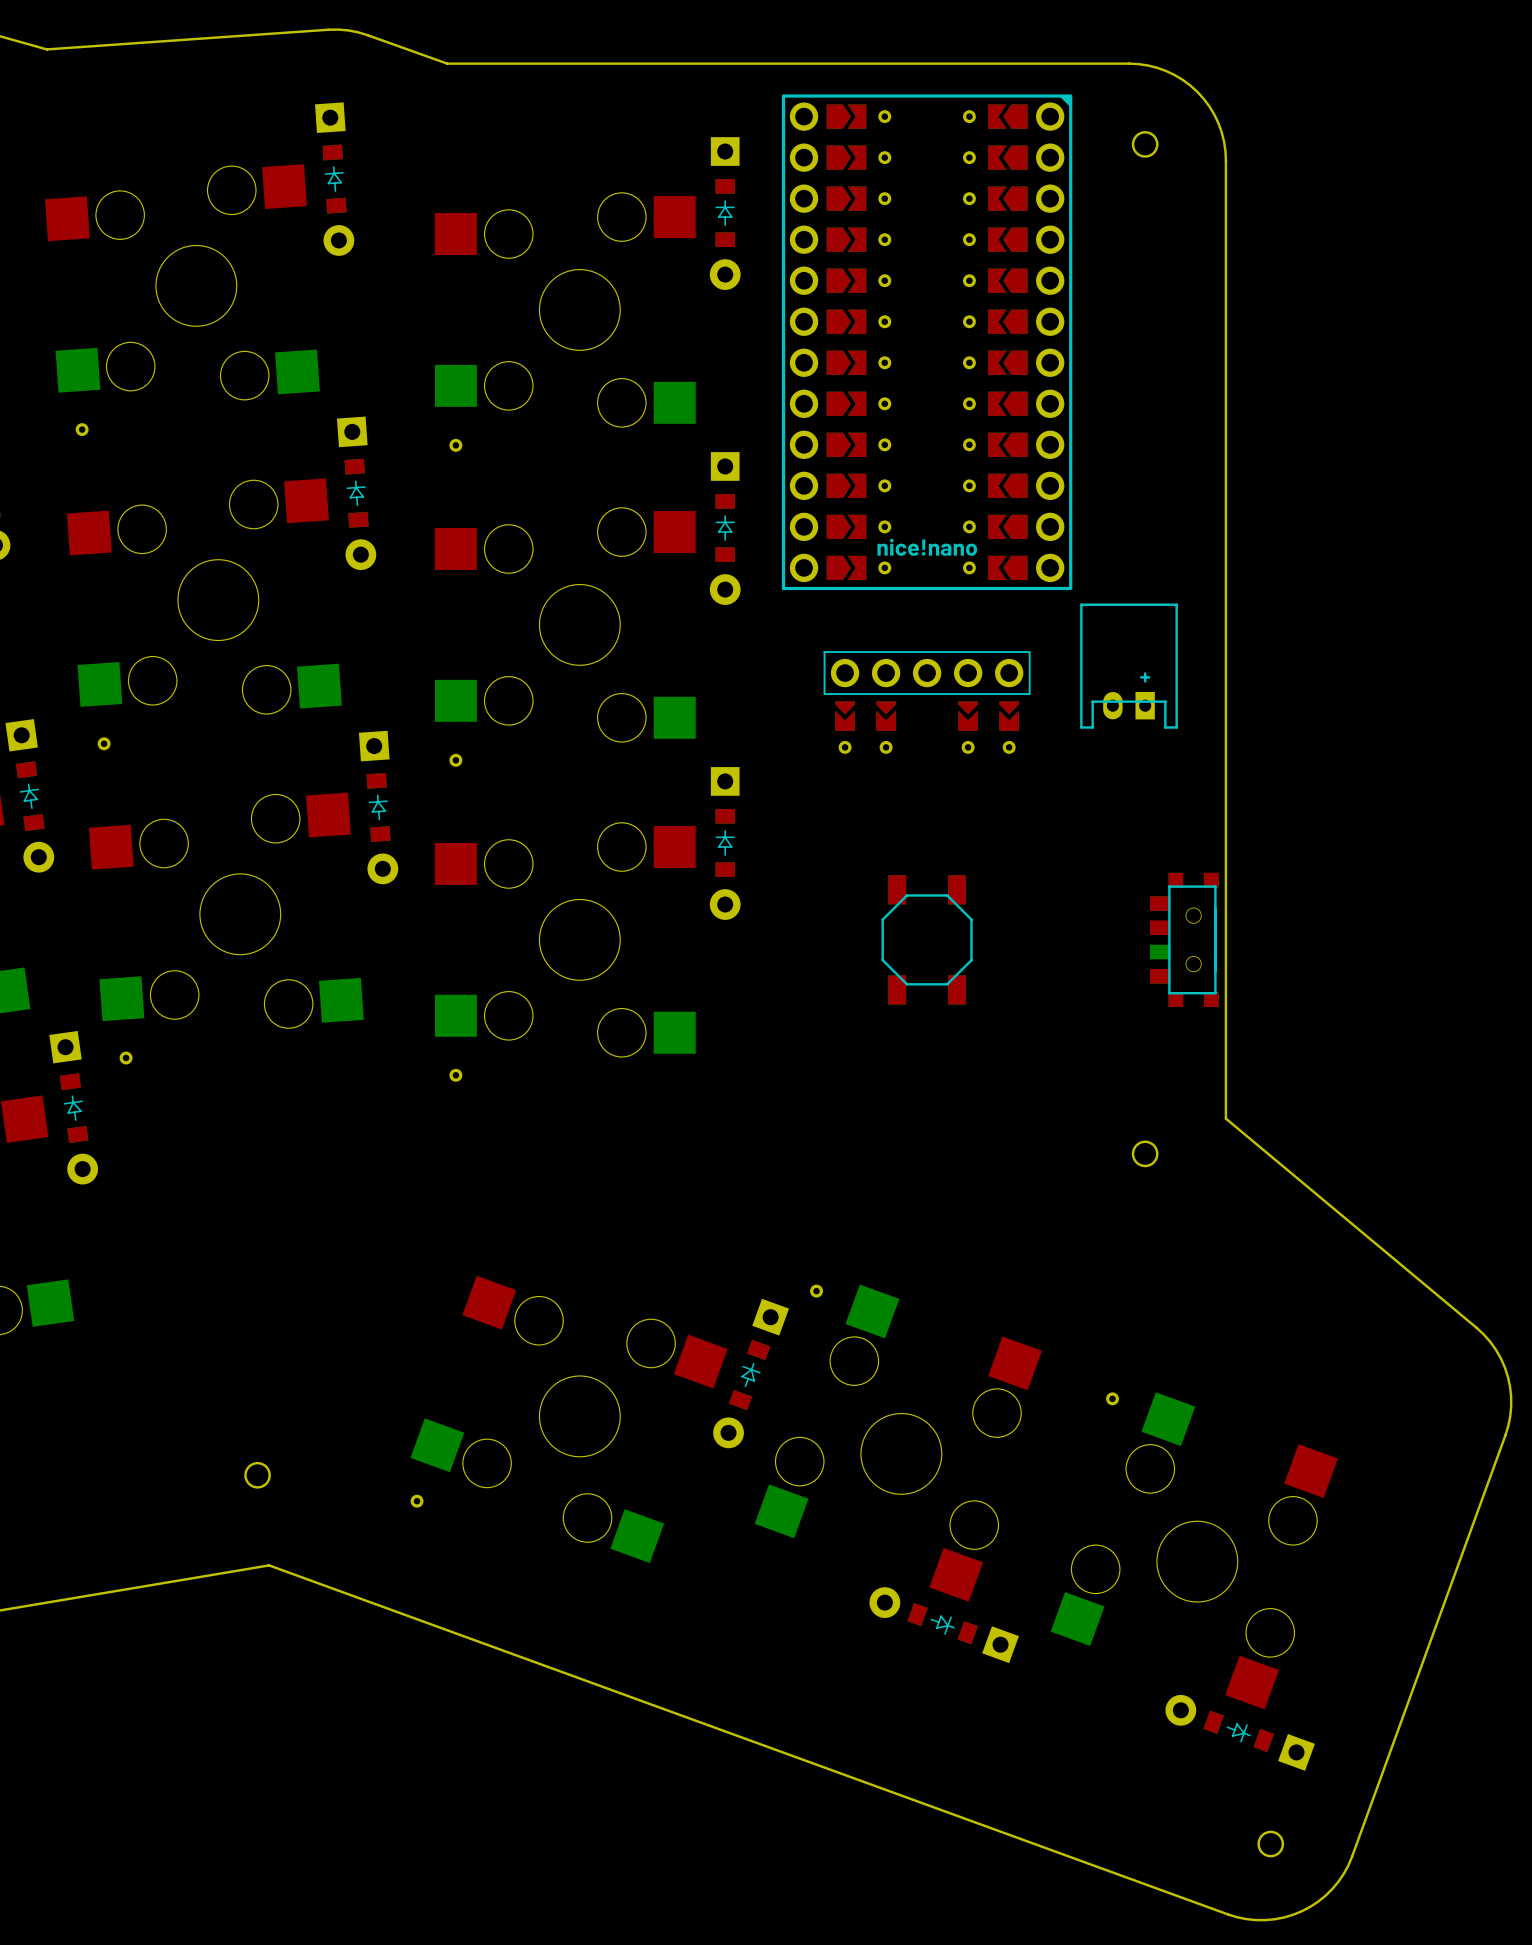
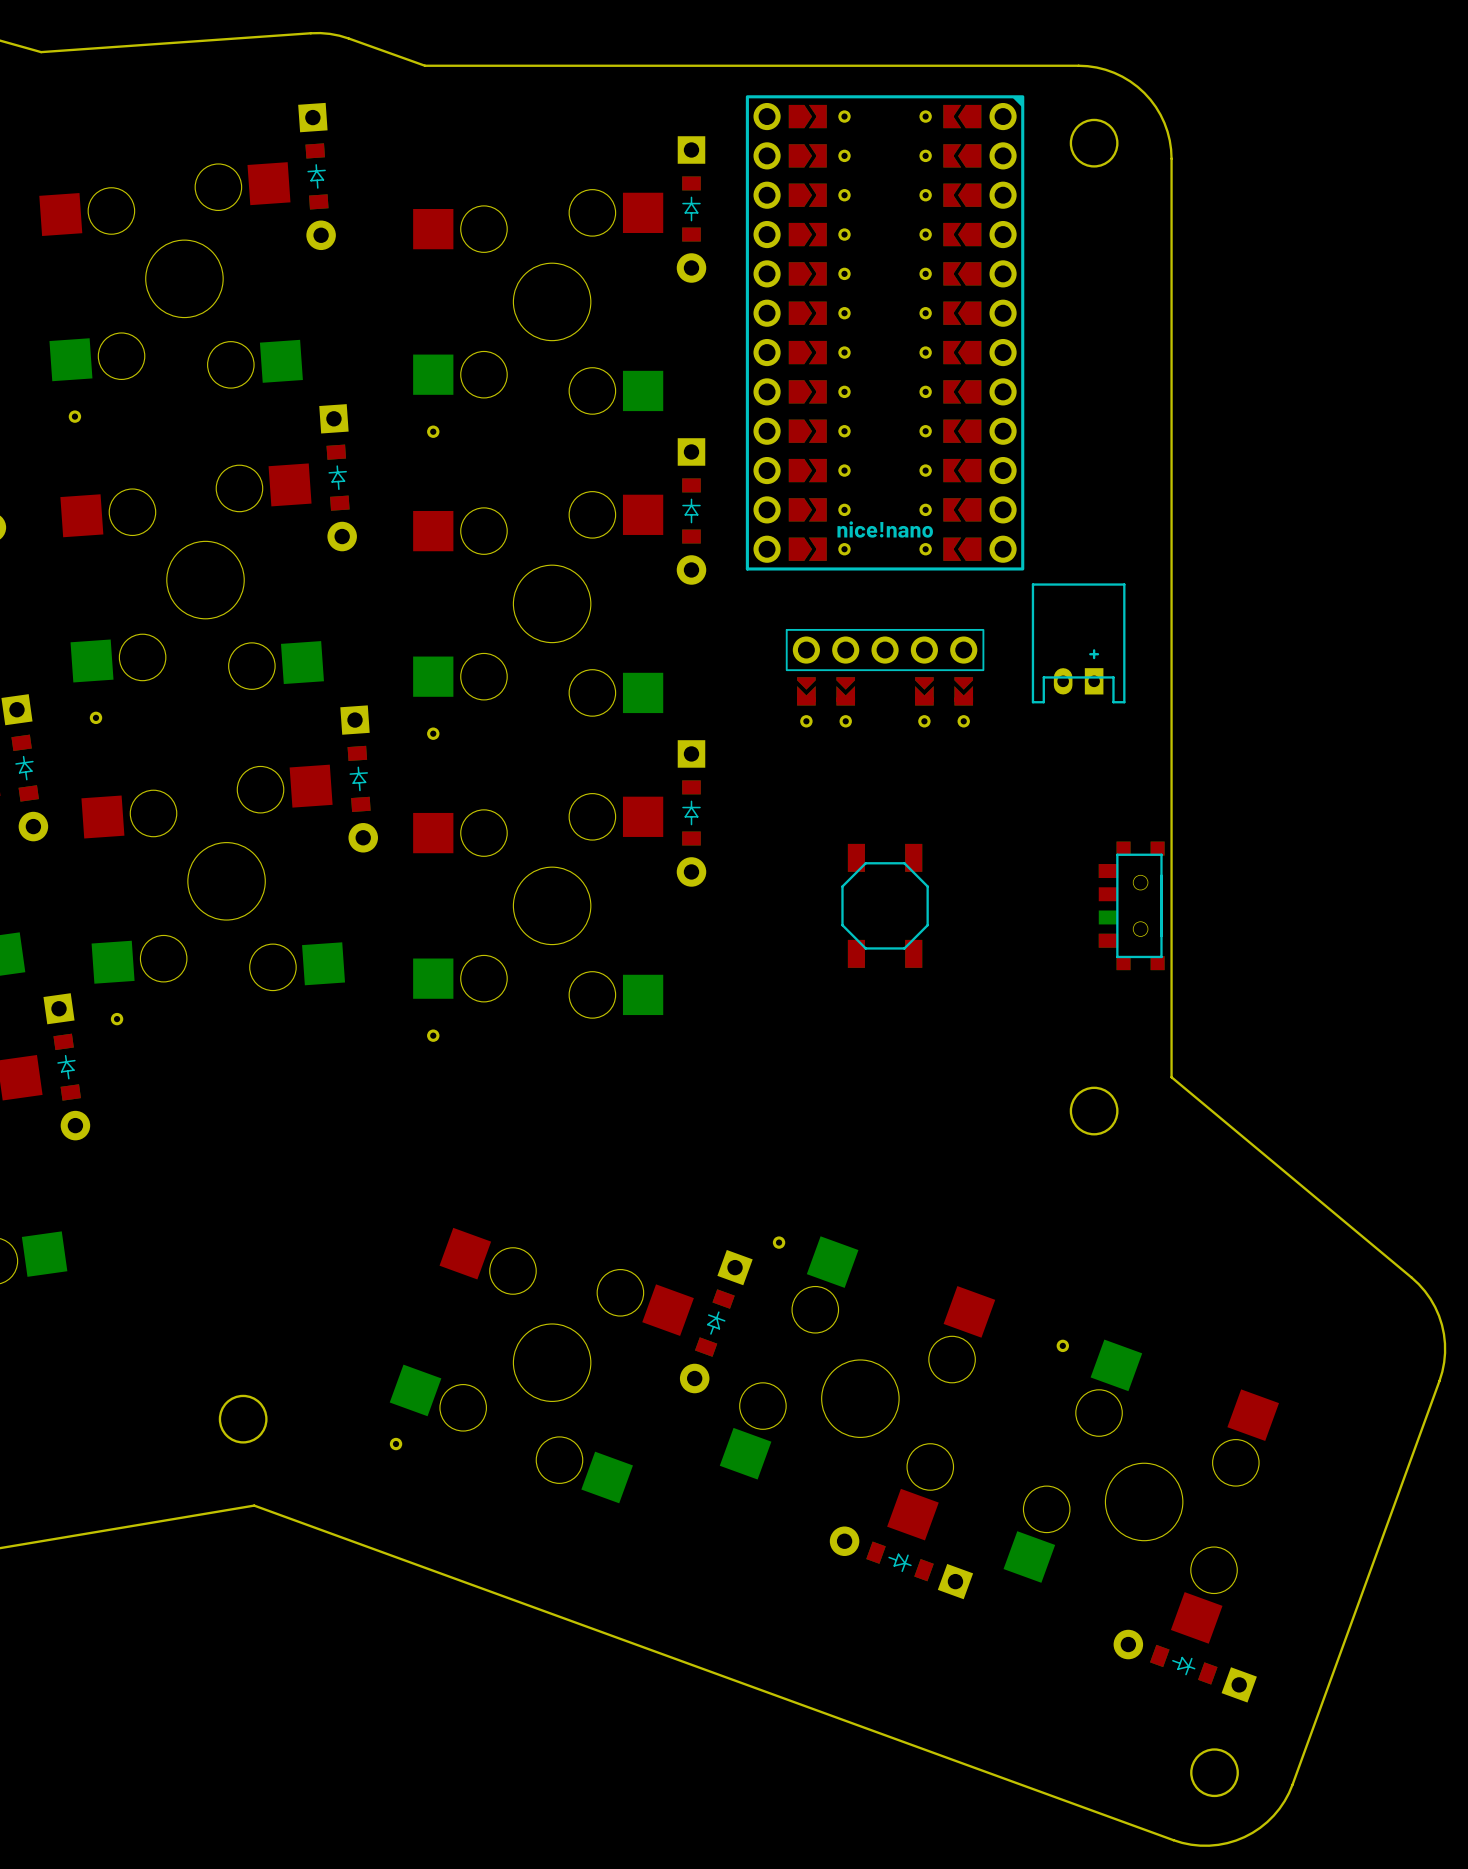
round board edge size: [1131, 131, 1159, 158] -> [1069, 118, 1119, 168]
round board edge size: [1131, 1140, 1159, 1168] -> [1069, 1086, 1119, 1136]
round board edge size: [244, 1461, 271, 1489] -> [218, 1394, 268, 1444]
round board edge size: [1257, 1830, 1285, 1858] -> [1190, 1748, 1239, 1798]

